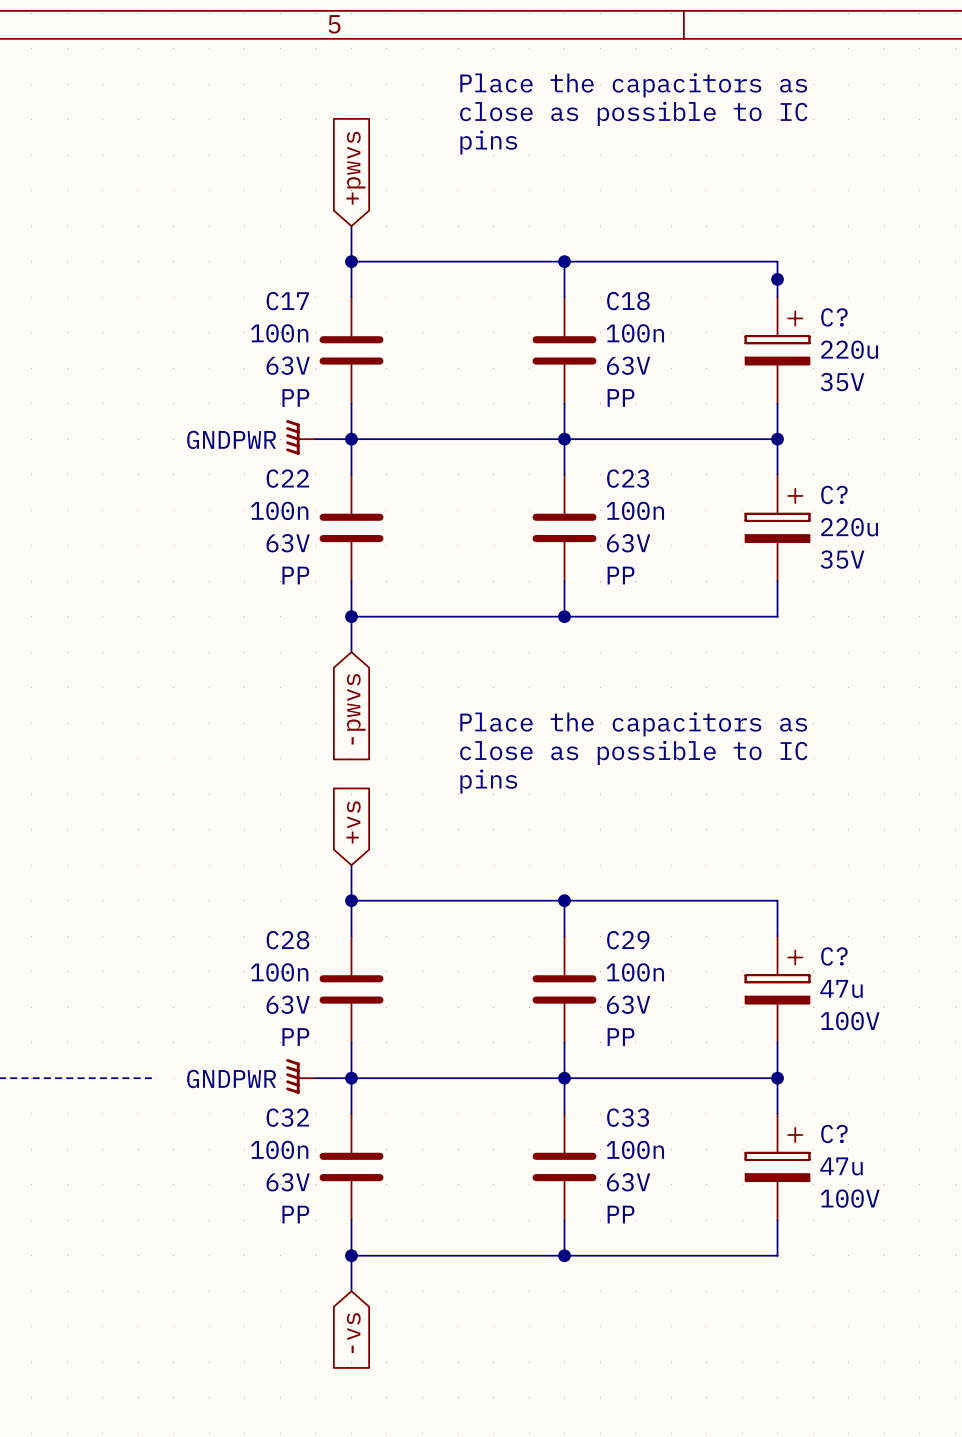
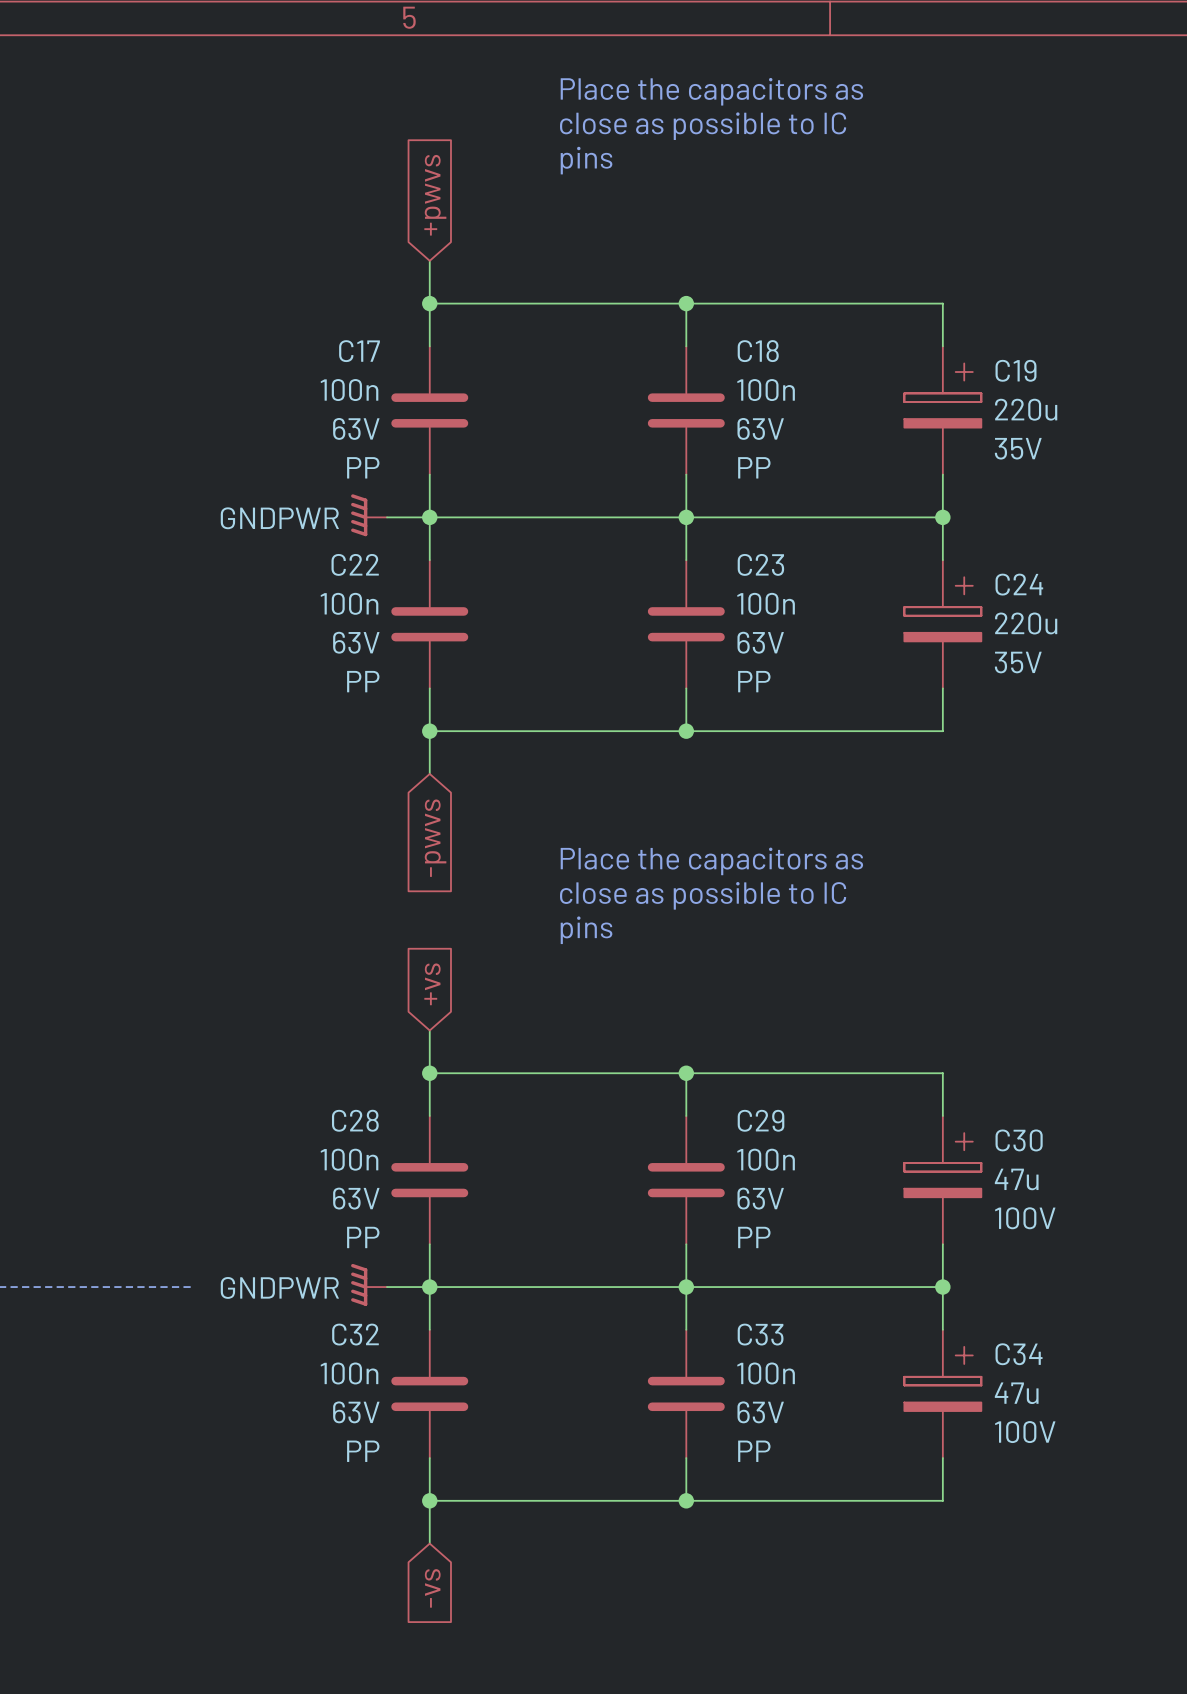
junction: (777, 279) -> none
C? name: C? (834, 317) -> C19 (1015, 370)
C? name: C? (834, 494) -> C24 (1019, 584)
C? name: C? (834, 956) -> C30 (1019, 1140)
C? name: C? (834, 1133) -> C34 (1019, 1354)

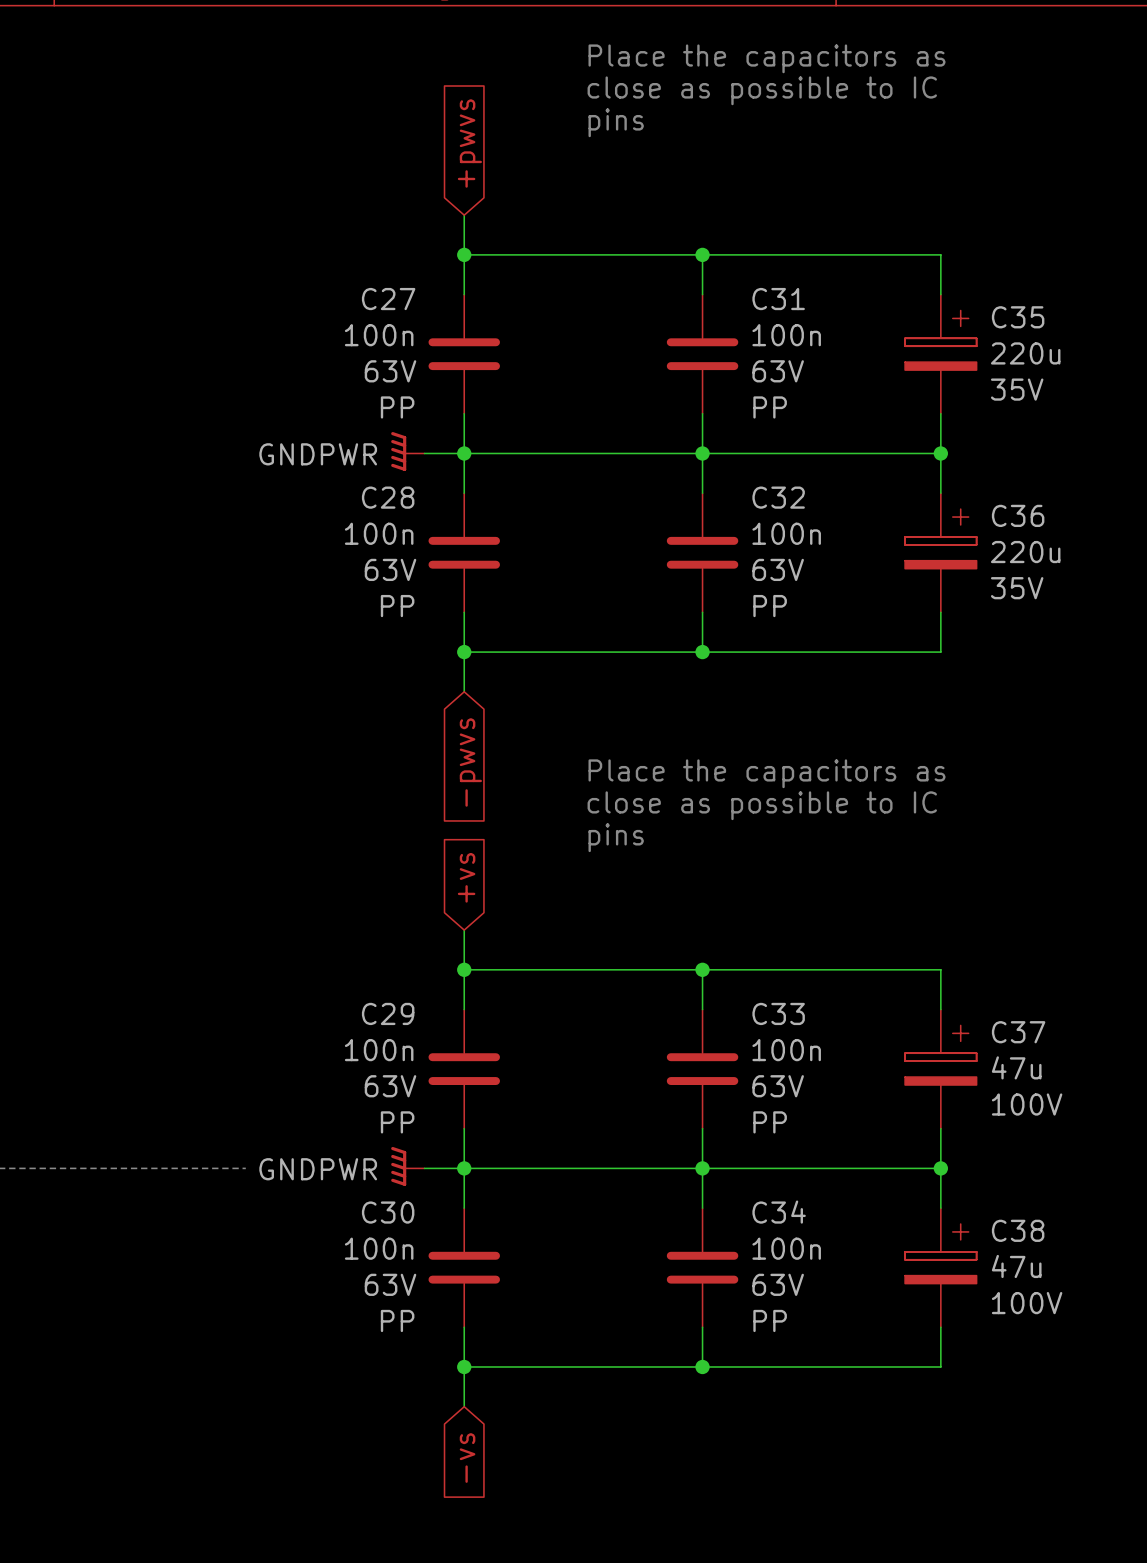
C17 name: C17 (359, 351) -> C27 (388, 299)
C18 name: C18 (758, 351) -> C31 (778, 299)
C19 name: C19 (1015, 370) -> C35 (1018, 317)
C22 name: C22 (355, 564) -> C28 (388, 497)
C23 name: C23 (760, 564) -> C32 (778, 497)
C24 name: C24 (1019, 584) -> C36 (1018, 515)
C28 name: C28 (355, 1120) -> C29 (388, 1013)
C29 name: C29 (761, 1120) -> C33 (778, 1013)
C30 name: C30 (1019, 1140) -> C37 (1018, 1032)
C32 name: C32 (355, 1334) -> C30 (388, 1212)
C33 name: C33 (760, 1334) -> C34 (779, 1212)
C34 name: C34 (1019, 1354) -> C38 (1018, 1230)

